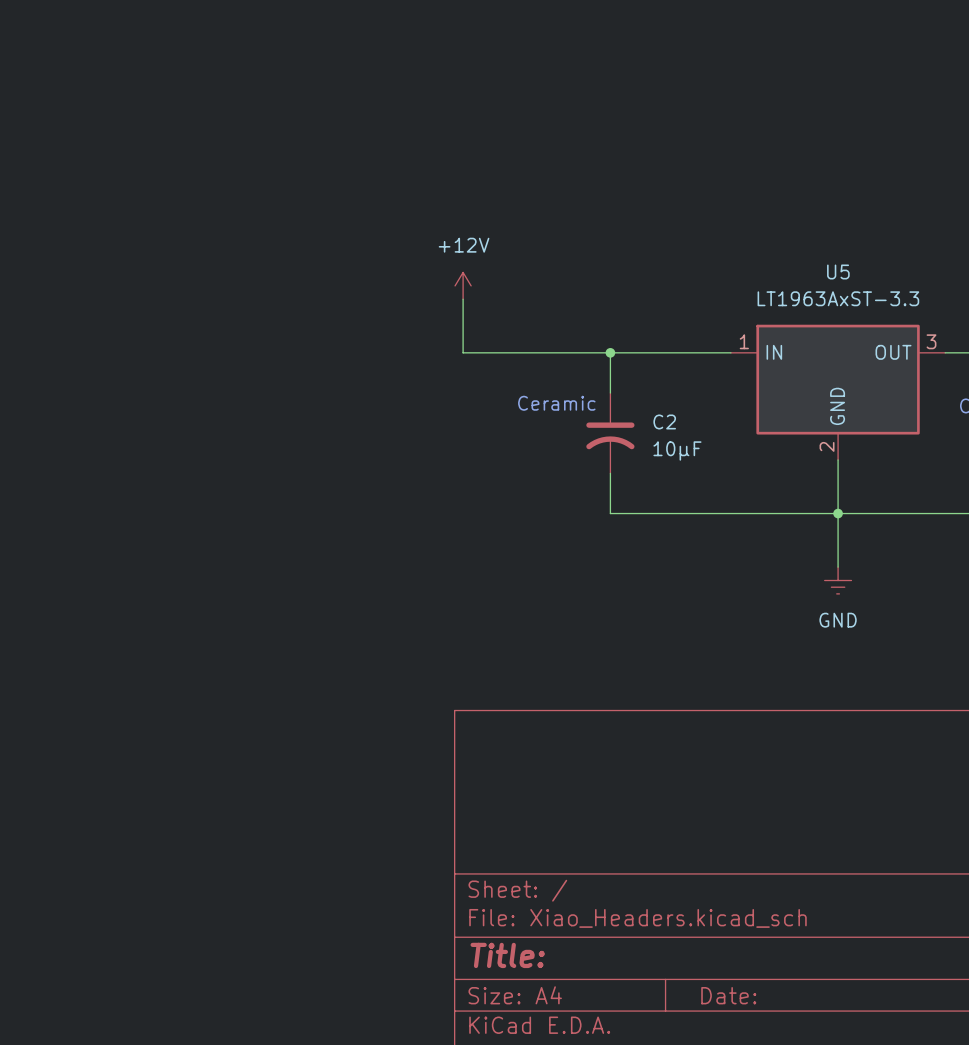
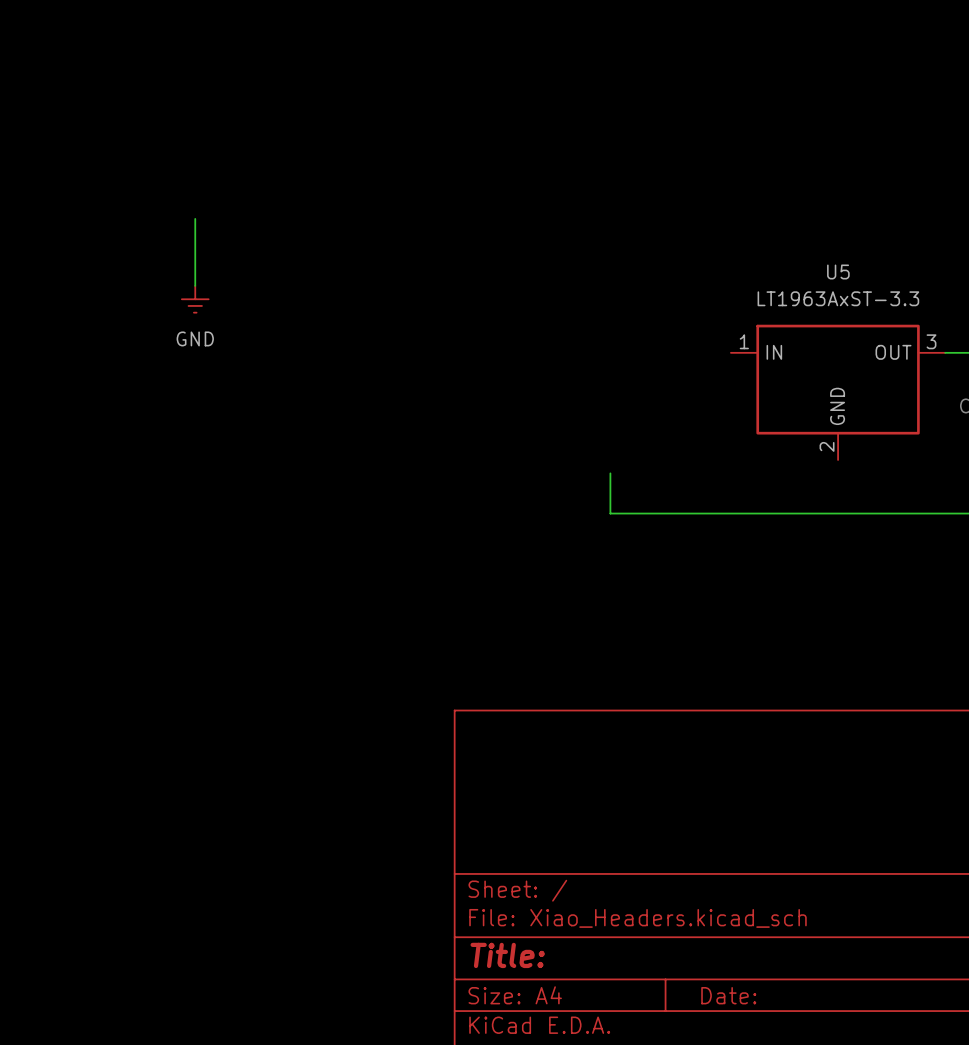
wire: none -> (195, 218) (195, 285)
power symbol: +12V (463, 285) -> none
power symbol: none -> GND (195, 299)
wire: (463, 299) (463, 352) (730, 352) -> none
wire: (610, 352) (610, 393) -> none
junction: (610, 352) -> none
text: Ceramic (556, 403) -> none
C2: 10μF (610, 433) -> none
wire: (838, 459) (838, 567) -> none
junction: (838, 513) -> none
power symbol: GND (838, 580) -> none

